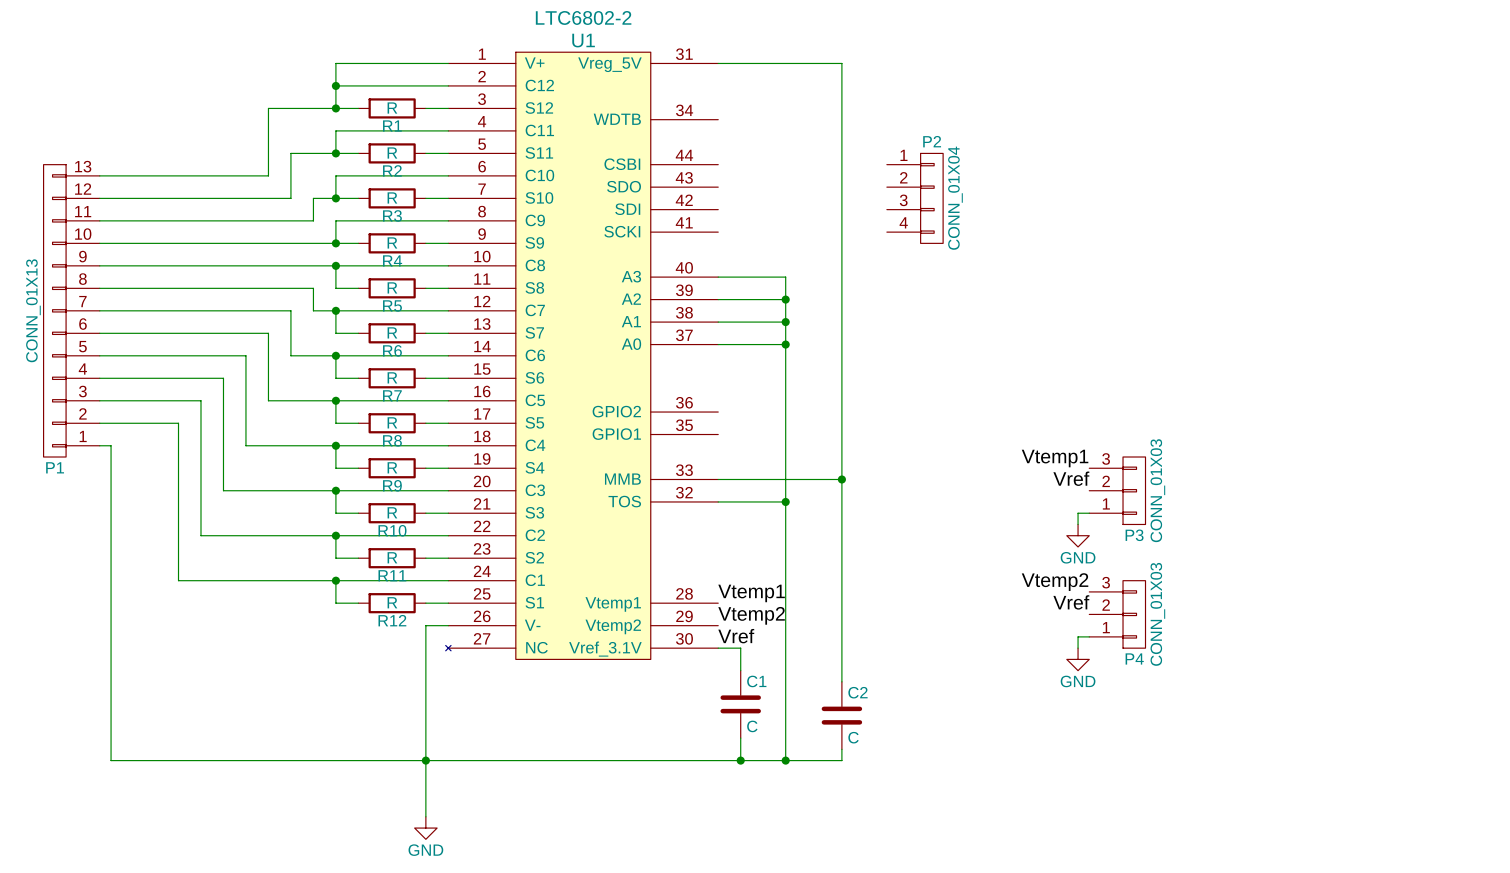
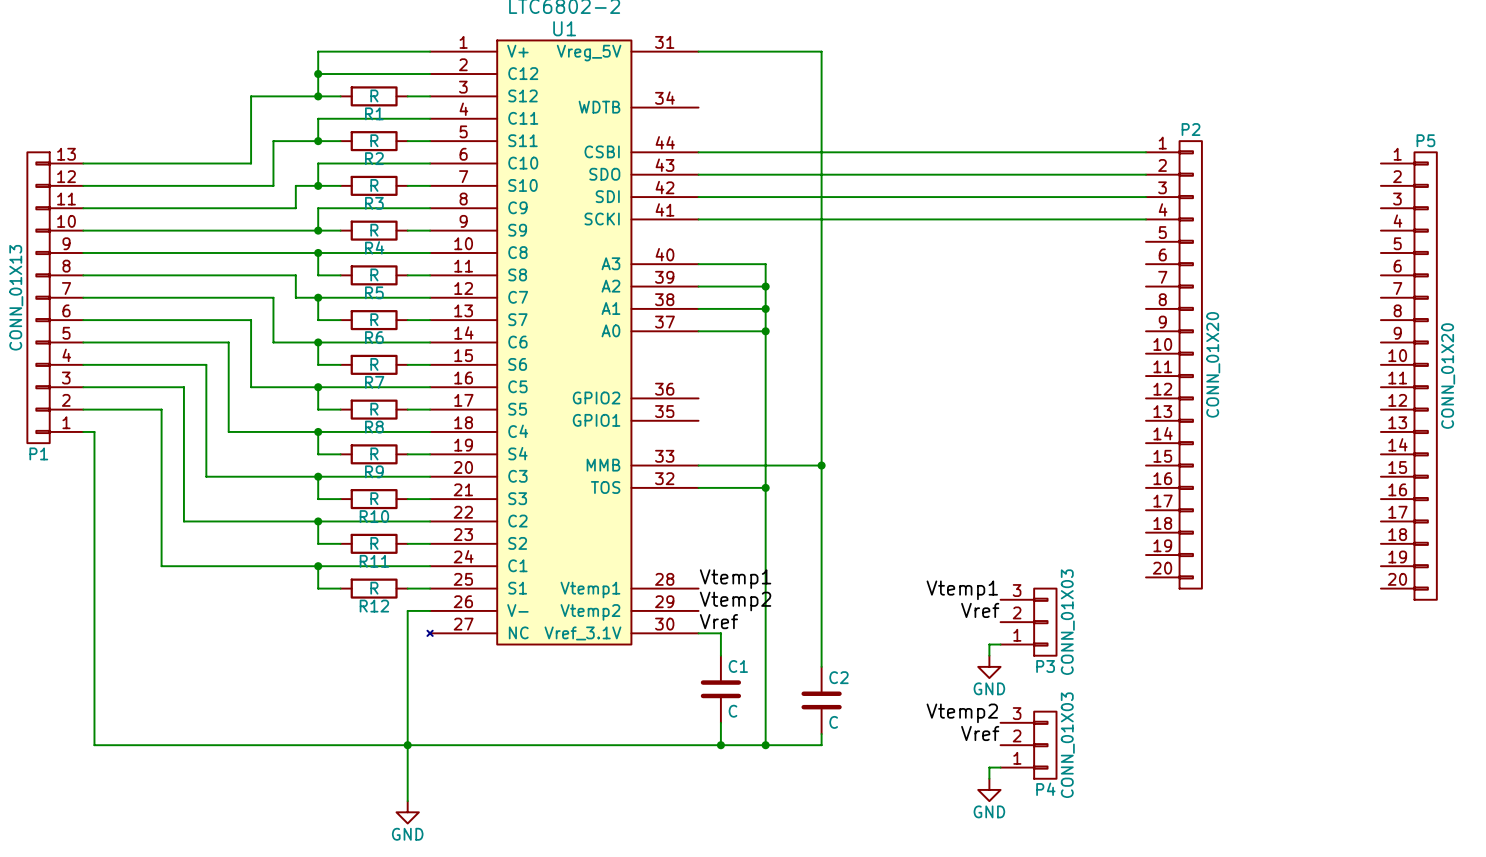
P2 name position: P2 (932, 141) -> P2 (1191, 129)
P2 symbol: [886, 153, 944, 244] -> [1146, 141, 1202, 589]
wire: none -> (698, 152) (1146, 152)
wire: none -> (698, 174) (1146, 174)
P2 value: CONN_01X04 (955, 198) -> CONN_01X20 (1213, 364)
wire: none -> (698, 197) (1146, 197)
wire: none -> (698, 219) (1146, 219)
P5: none -> CONN_01X20 (1408, 376)
label position: Vtemp1 (1055, 458) -> Vtemp1 (962, 590)
label: Vref (1071, 478) -> none
P3 position: (1117, 490) -> (1028, 622)
wire: (1089, 513) (1078, 513) (1078, 524) -> (1000, 644) (989, 644) (989, 655)
power symbol: GND (1078, 535) -> none
label position: Vtemp2 (1055, 582) -> Vtemp2 (962, 713)
label position: Vref (1071, 602) -> Vref (980, 610)
P4 position: (1117, 614) -> (1028, 745)
wire: (1089, 636) (1078, 636) (1078, 648) -> (1000, 767) (989, 767) (989, 778)
power symbol position: GND (1078, 659) -> GND (989, 666)
label: none -> Vref (980, 733)
power symbol: none -> GND (989, 789)

